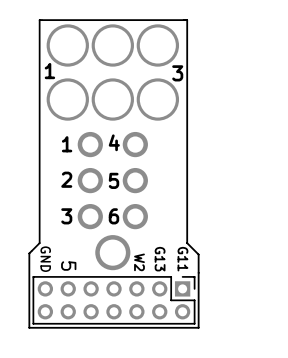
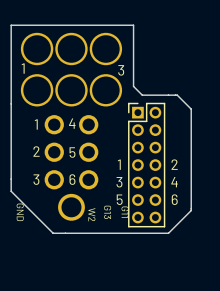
board edge: (39, 20) (187, 20) (187, 243) (198, 254) (198, 327) (29, 327) (29, 253) (39, 243) (39, 20) -> (11, 25) (11, 191) (53, 233) (168, 233) (191, 210) (191, 109) (177, 95) (142, 95) (133, 86) (133, 25) (11, 25)
text: none -> 1 (119, 164)
text: none -> 2 (174, 164)
text: none -> 3 (119, 182)
text: none -> 4 (174, 182)
text: none -> 6 (174, 199)
text rotation: 0° (68, 266) -> 90° counterclockwise (119, 199)
text position: 5 (68, 266) -> 5 (119, 199)
part rotation: 0° (113, 300) -> 90° counterclockwise (146, 165)
part position: (113, 300) -> (146, 165)

